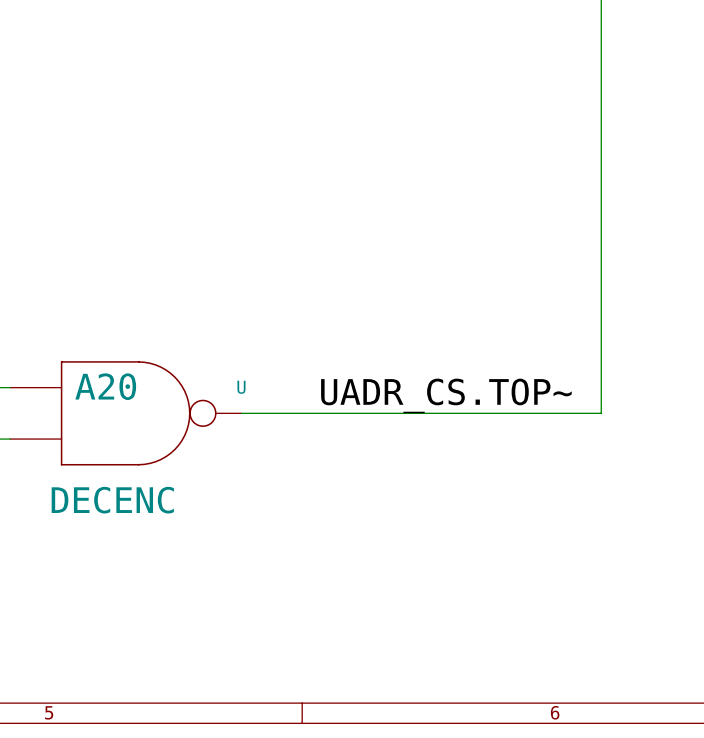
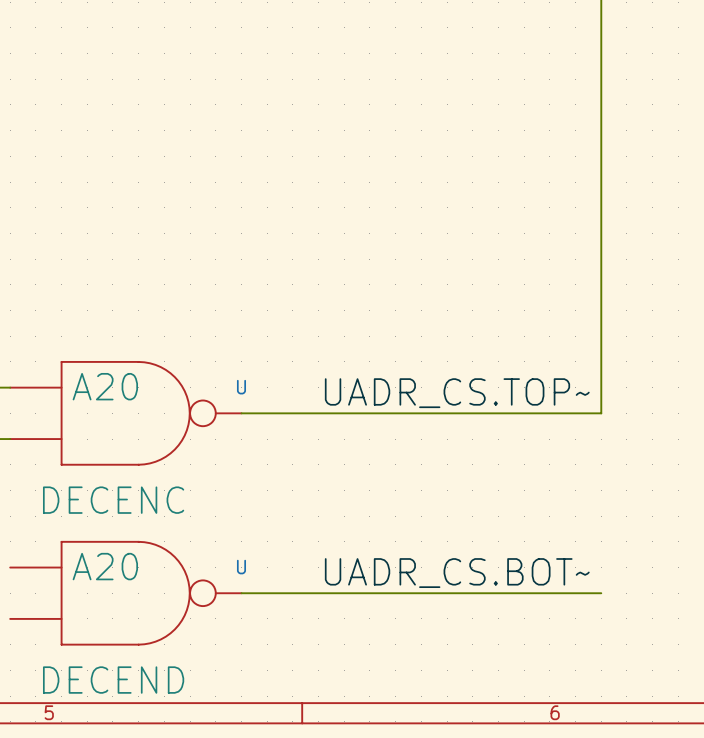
label: none -> UADR_CS.BOT~ (457, 573)
U: none -> (125, 593)
wire: none -> (241, 593) (601, 593)

